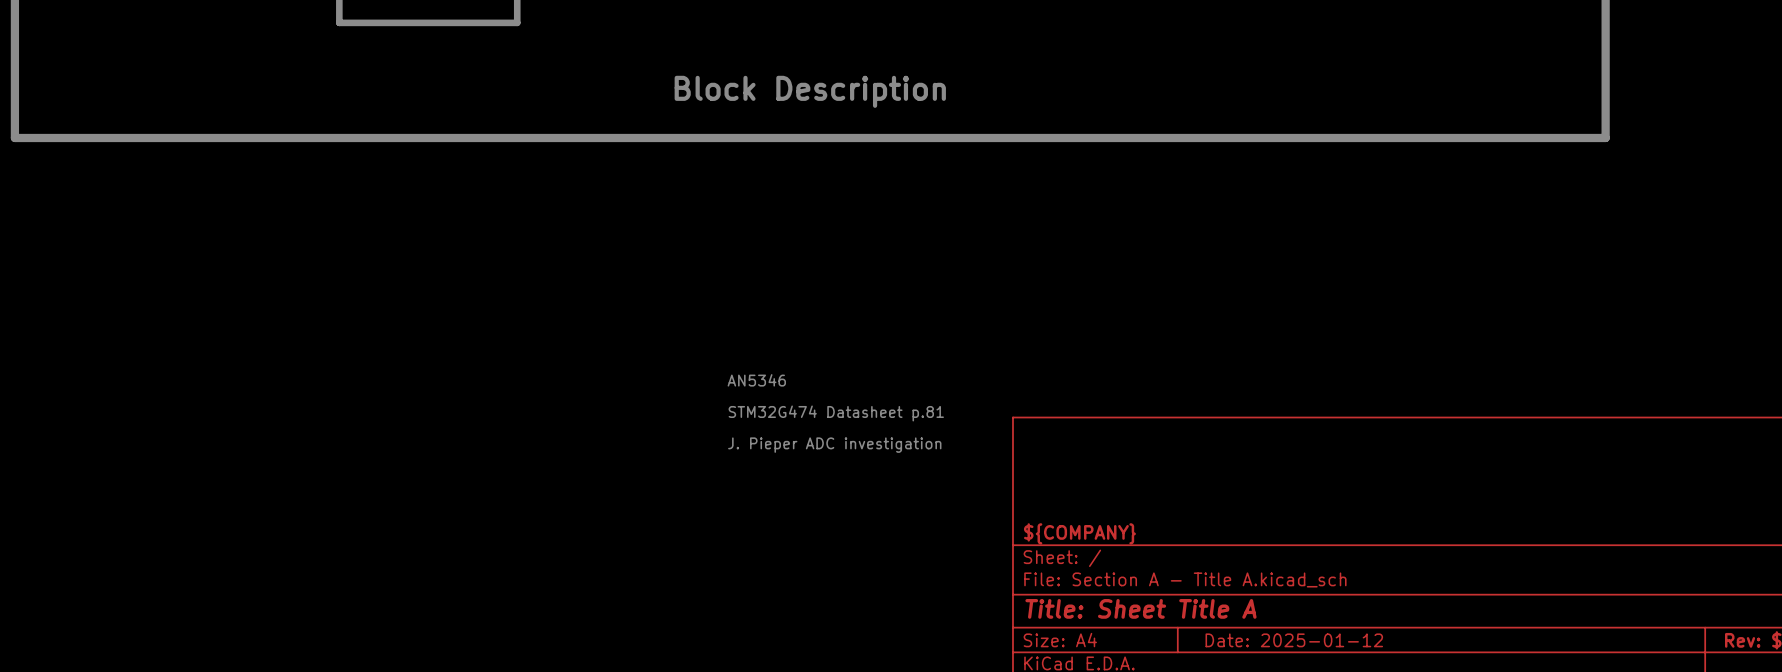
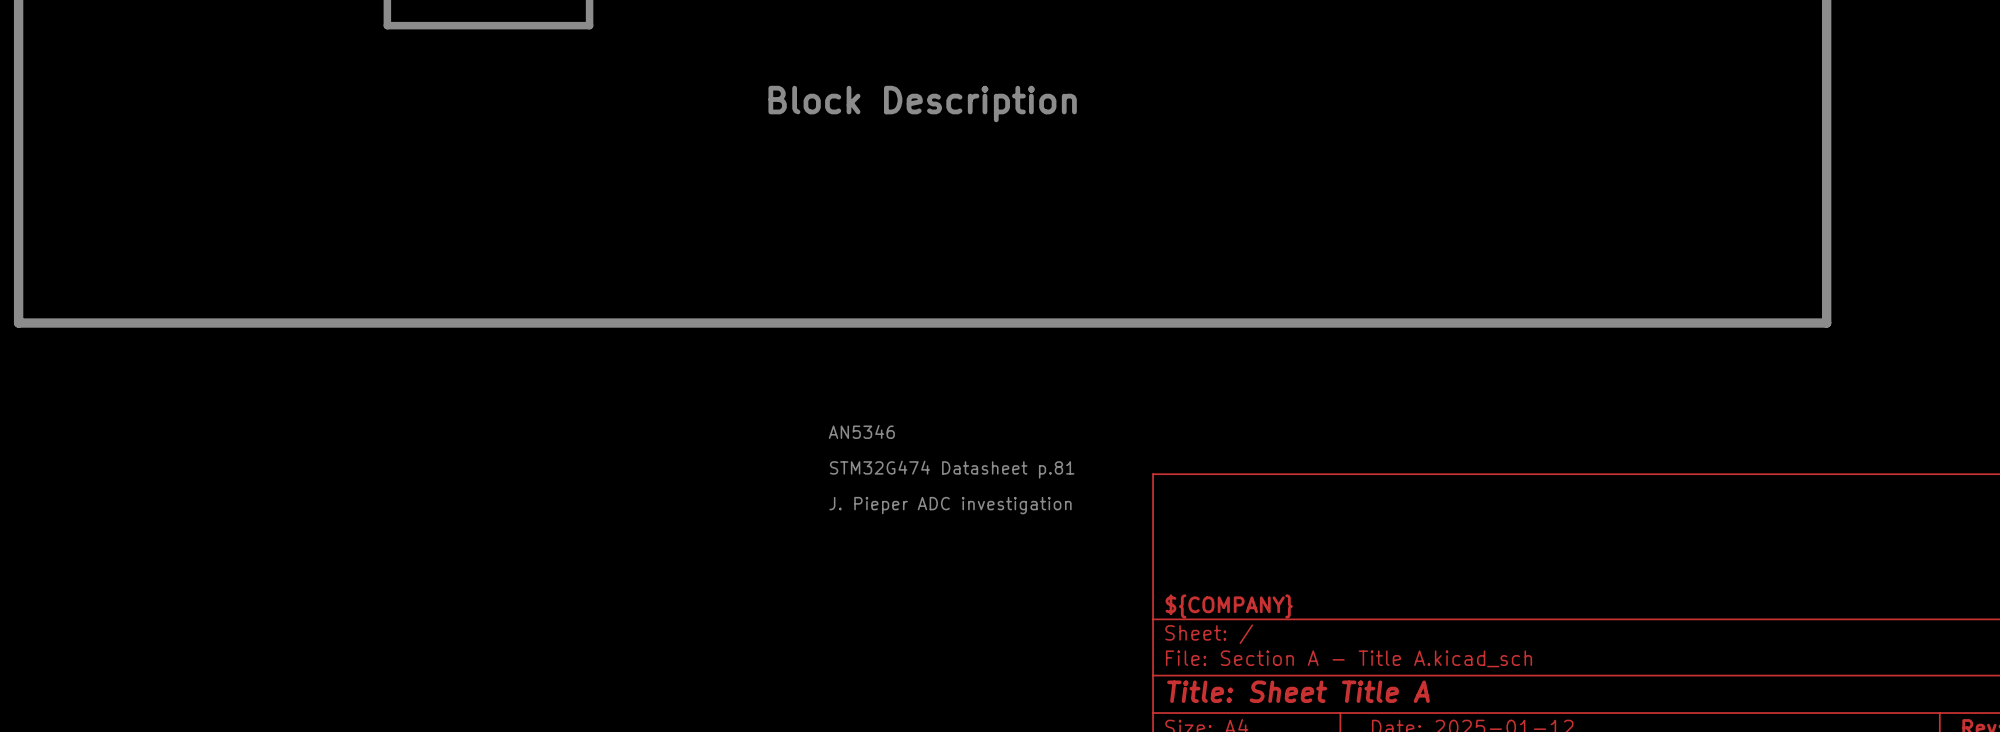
line: (14, 137) (1605, 137) -> (18, 156) (18, 323) (1826, 323) (1826, 156)

